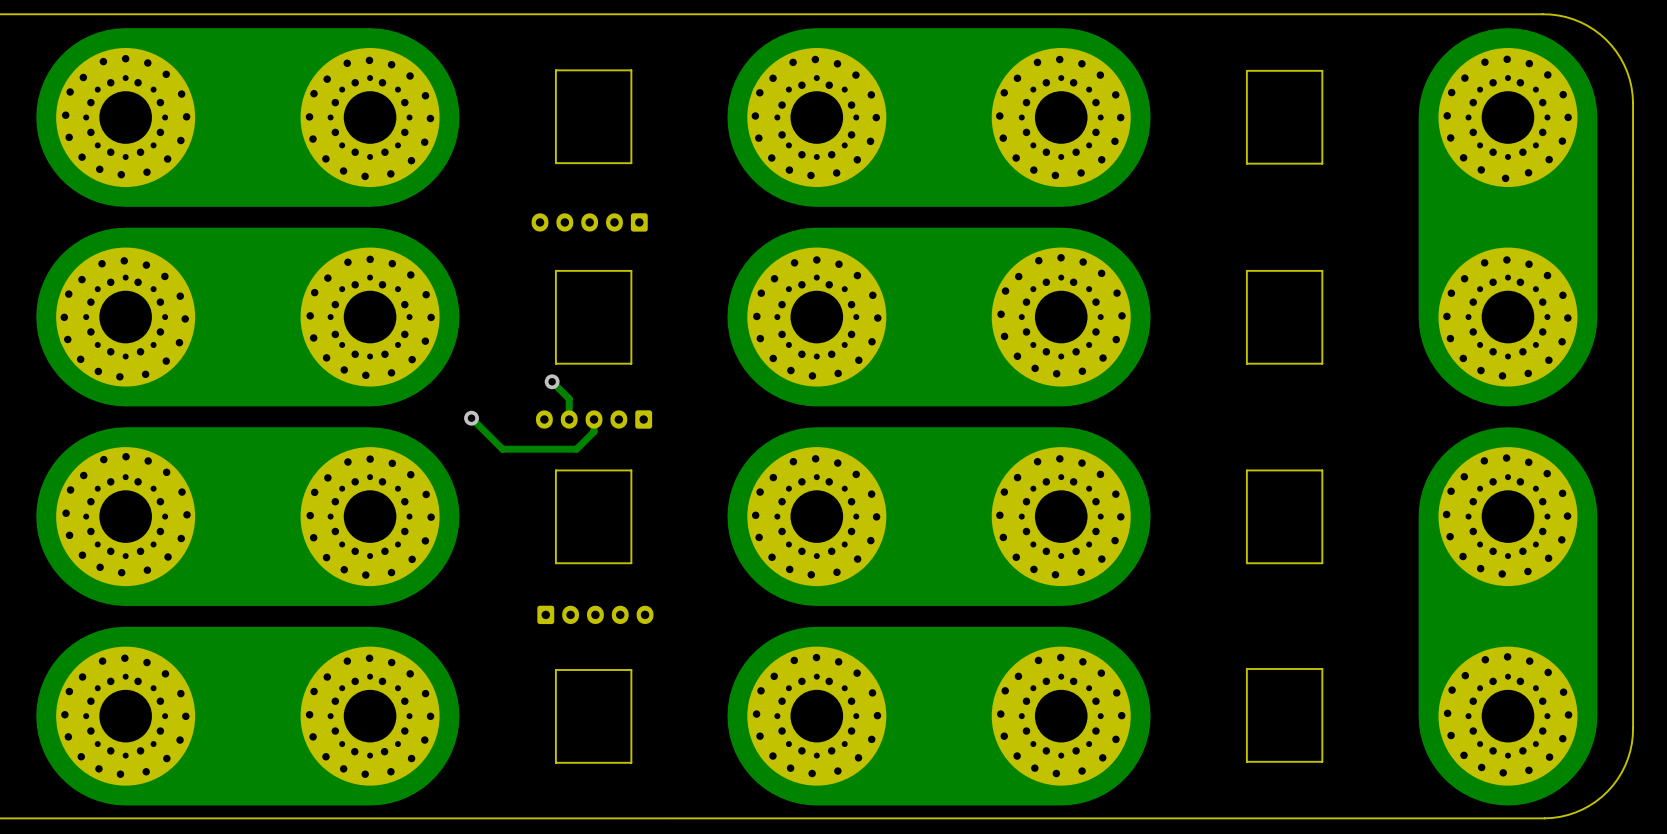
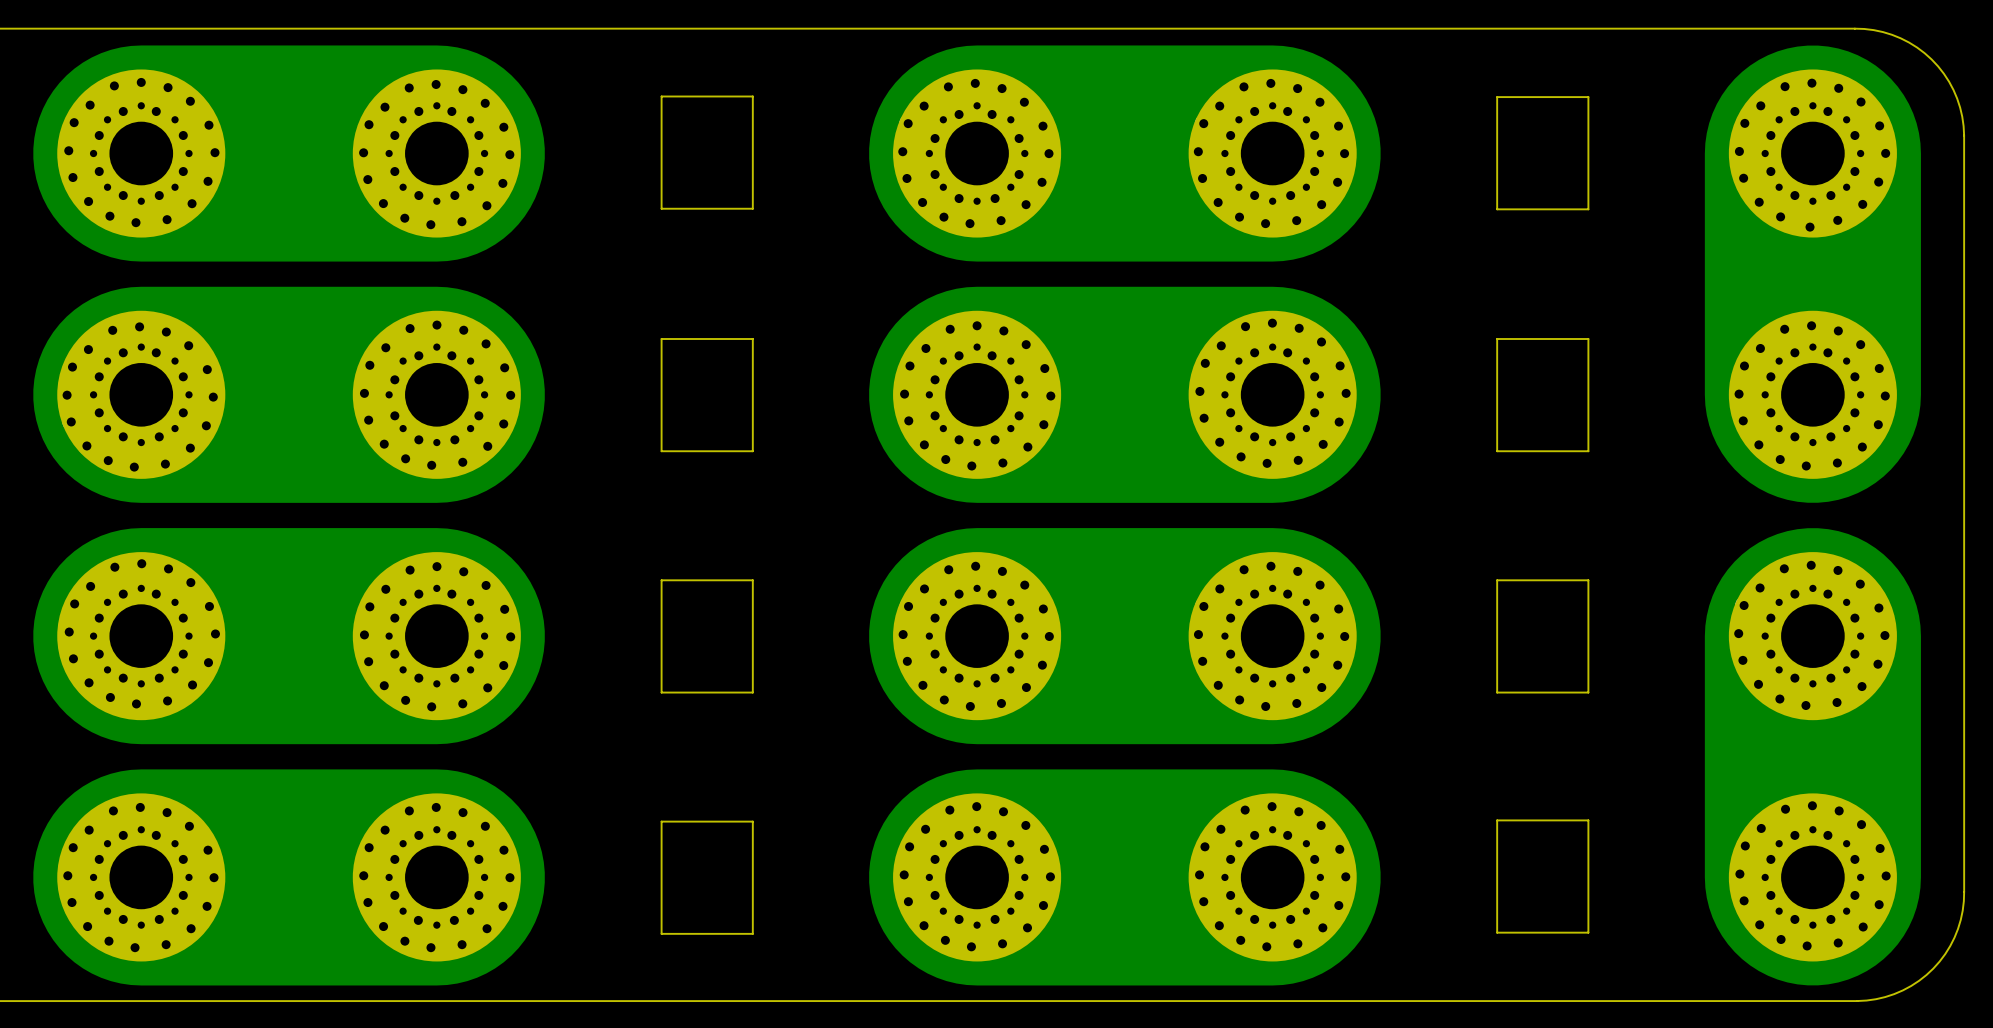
part: (589, 222) -> none
track: (552, 381) (569, 398) (569, 419) -> none
via: (552, 381) -> none
track: (471, 418) (502, 449) (576, 449) (594, 431) (594, 419) -> none
via: (471, 418) -> none
part: (594, 419) -> none
part: (595, 614) -> none

